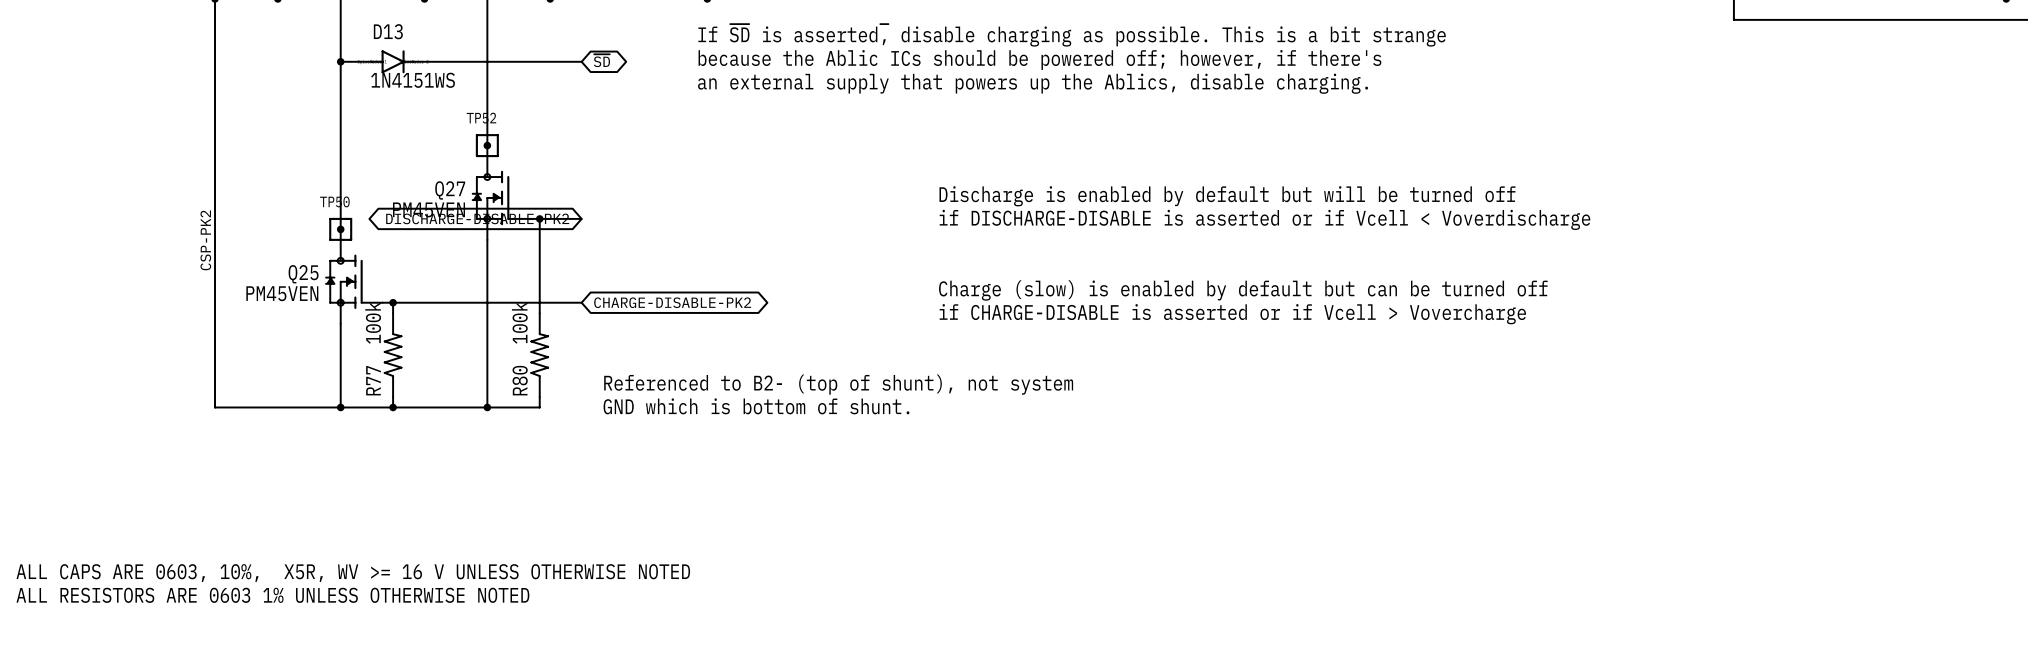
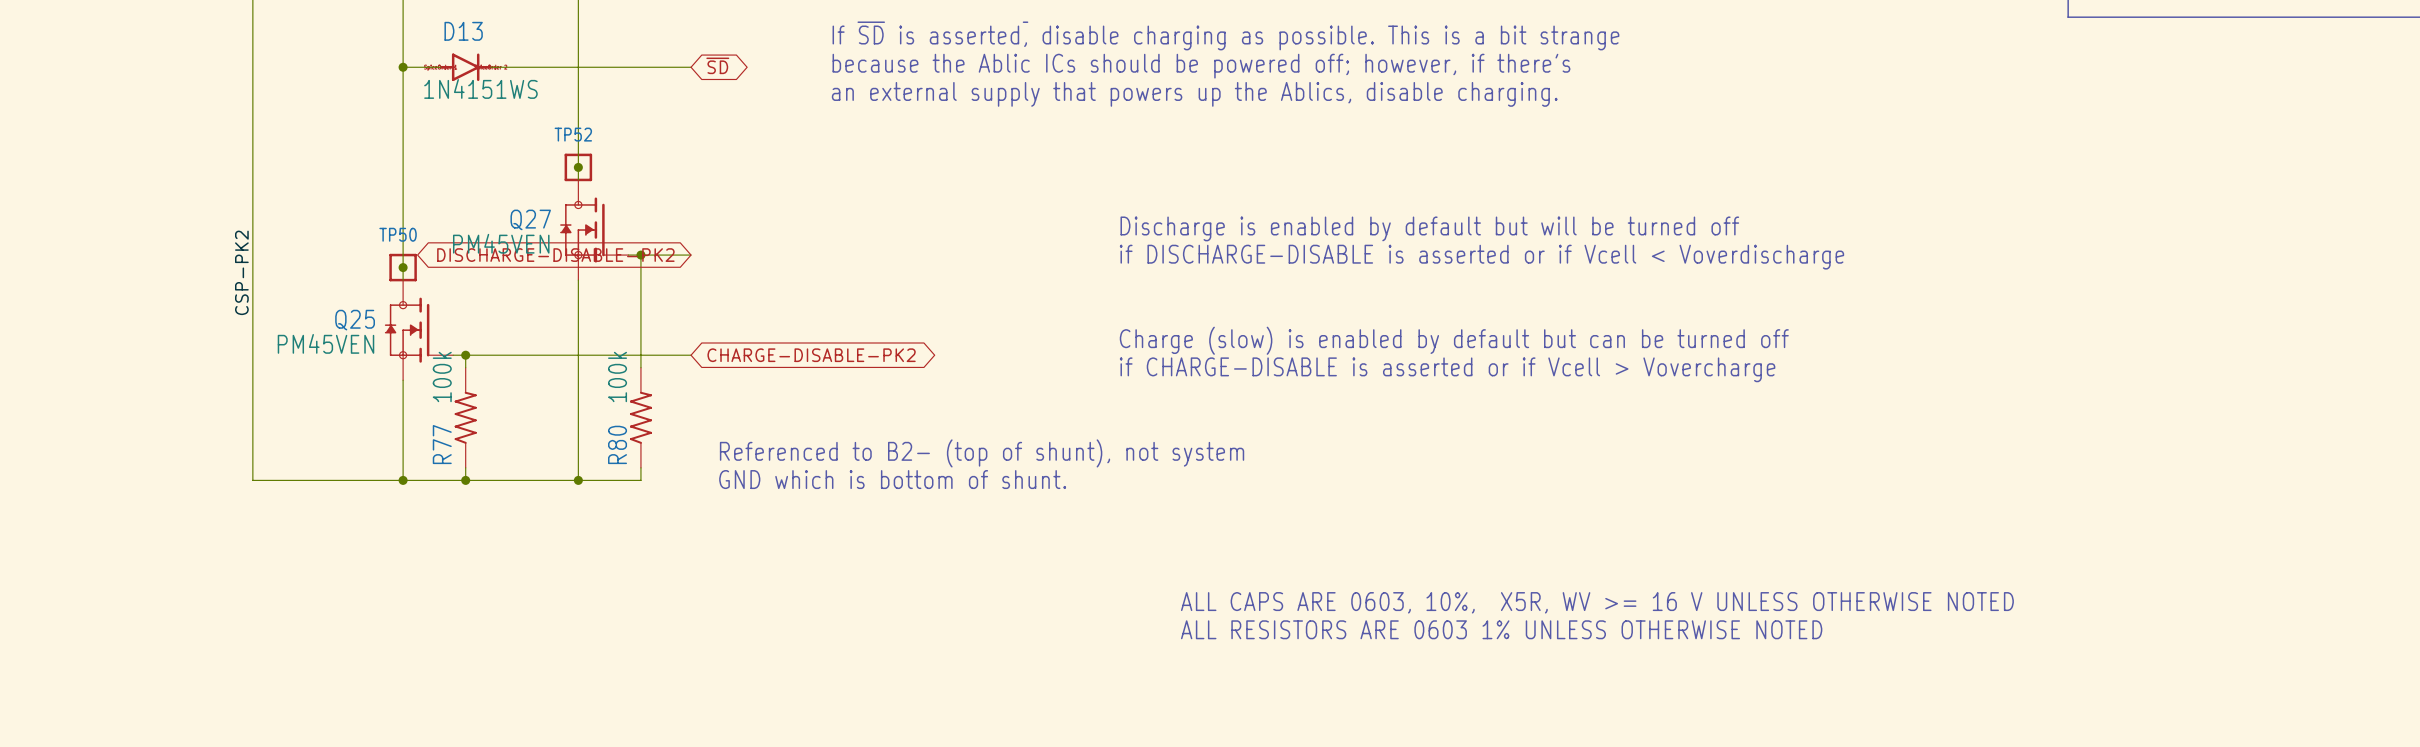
text: none -> ALL CAPS ARE 0603, 10%, X5R, WV >= 16 V UNLESS OTHERWISE NOTED (1597, 602)
text: none -> ALL RESISTORS ARE 0603 1% UNLESS OTHERWISE NOTED (1501, 629)
text: ALL CAPS ARE 0603, 10%, X5R, WV >= 16 V UNLESS OTHERWISE NOTED (353, 573) -> none
text: ALL RESISTORS ARE 0603 1% UNLESS OTHERWISE NOTED (272, 595) -> none

